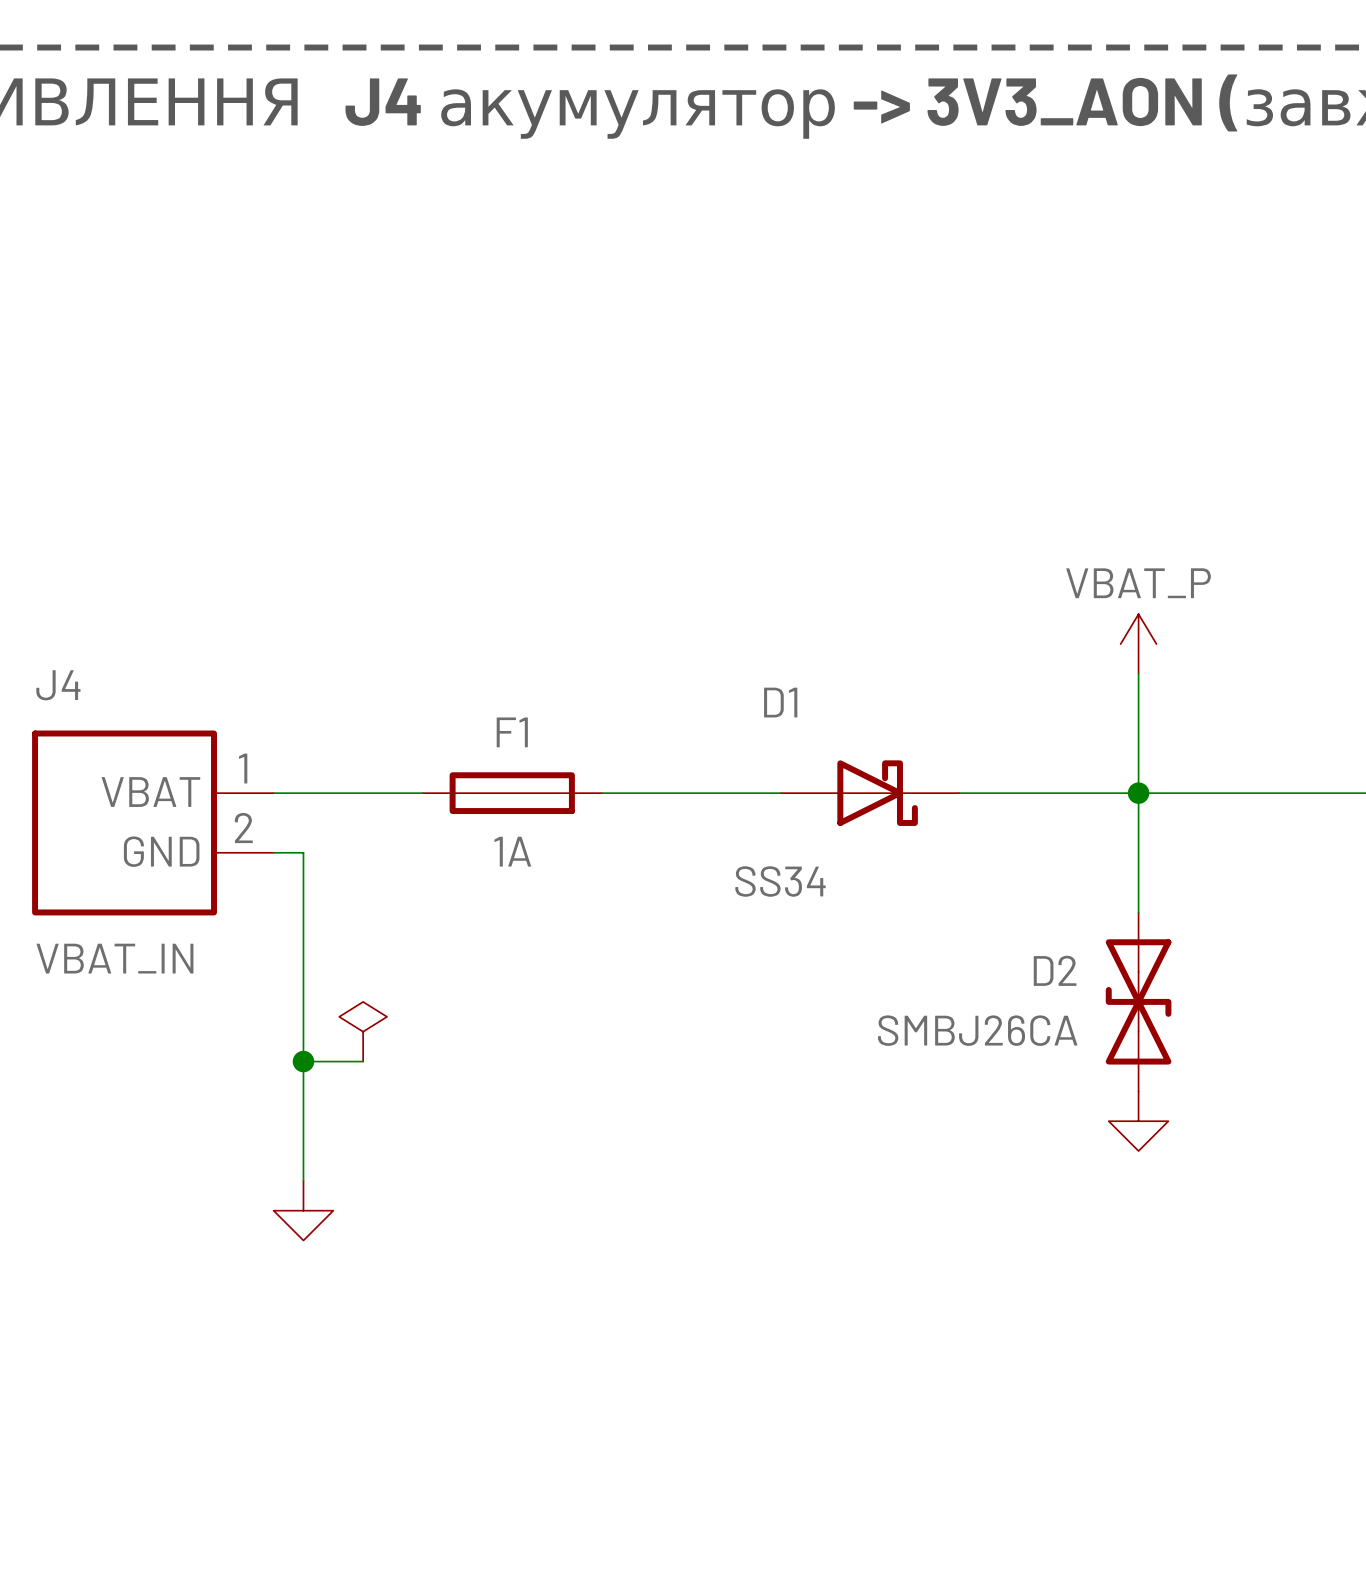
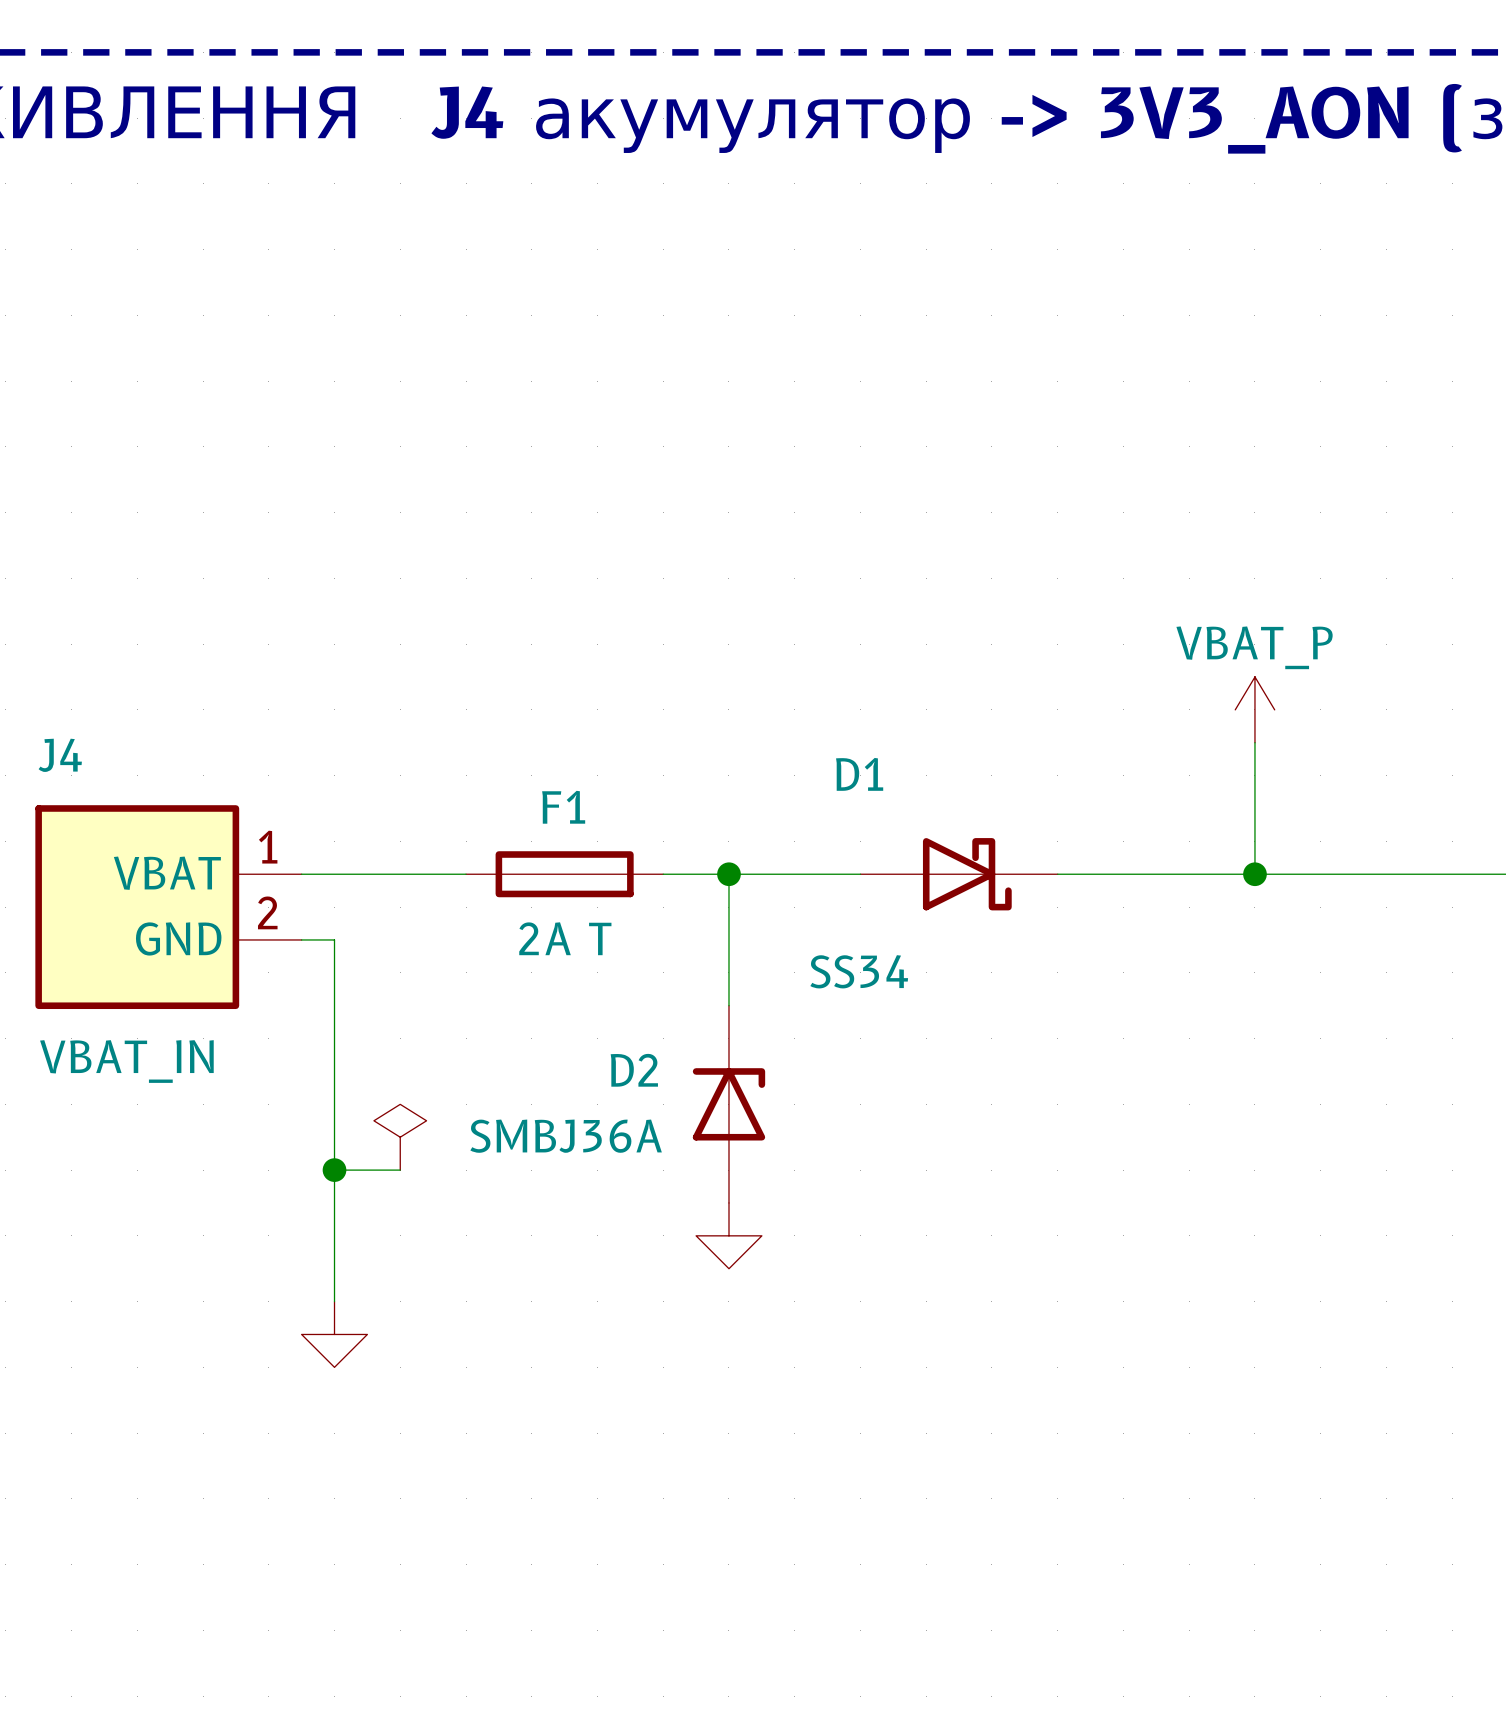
junction: none -> (728, 874)
wire: (1138, 793) (1138, 912) -> (728, 874) (728, 1005)
F1 value: 1A (512, 851) -> 2A T (565, 938)
D2 symbol: [1105, 912, 1172, 1092] -> [692, 1005, 766, 1203]
D2 value: SMBJ26CA (977, 1030) -> SMBJ36A (566, 1136)
power symbol position: (1138, 1121) -> (728, 1235)

